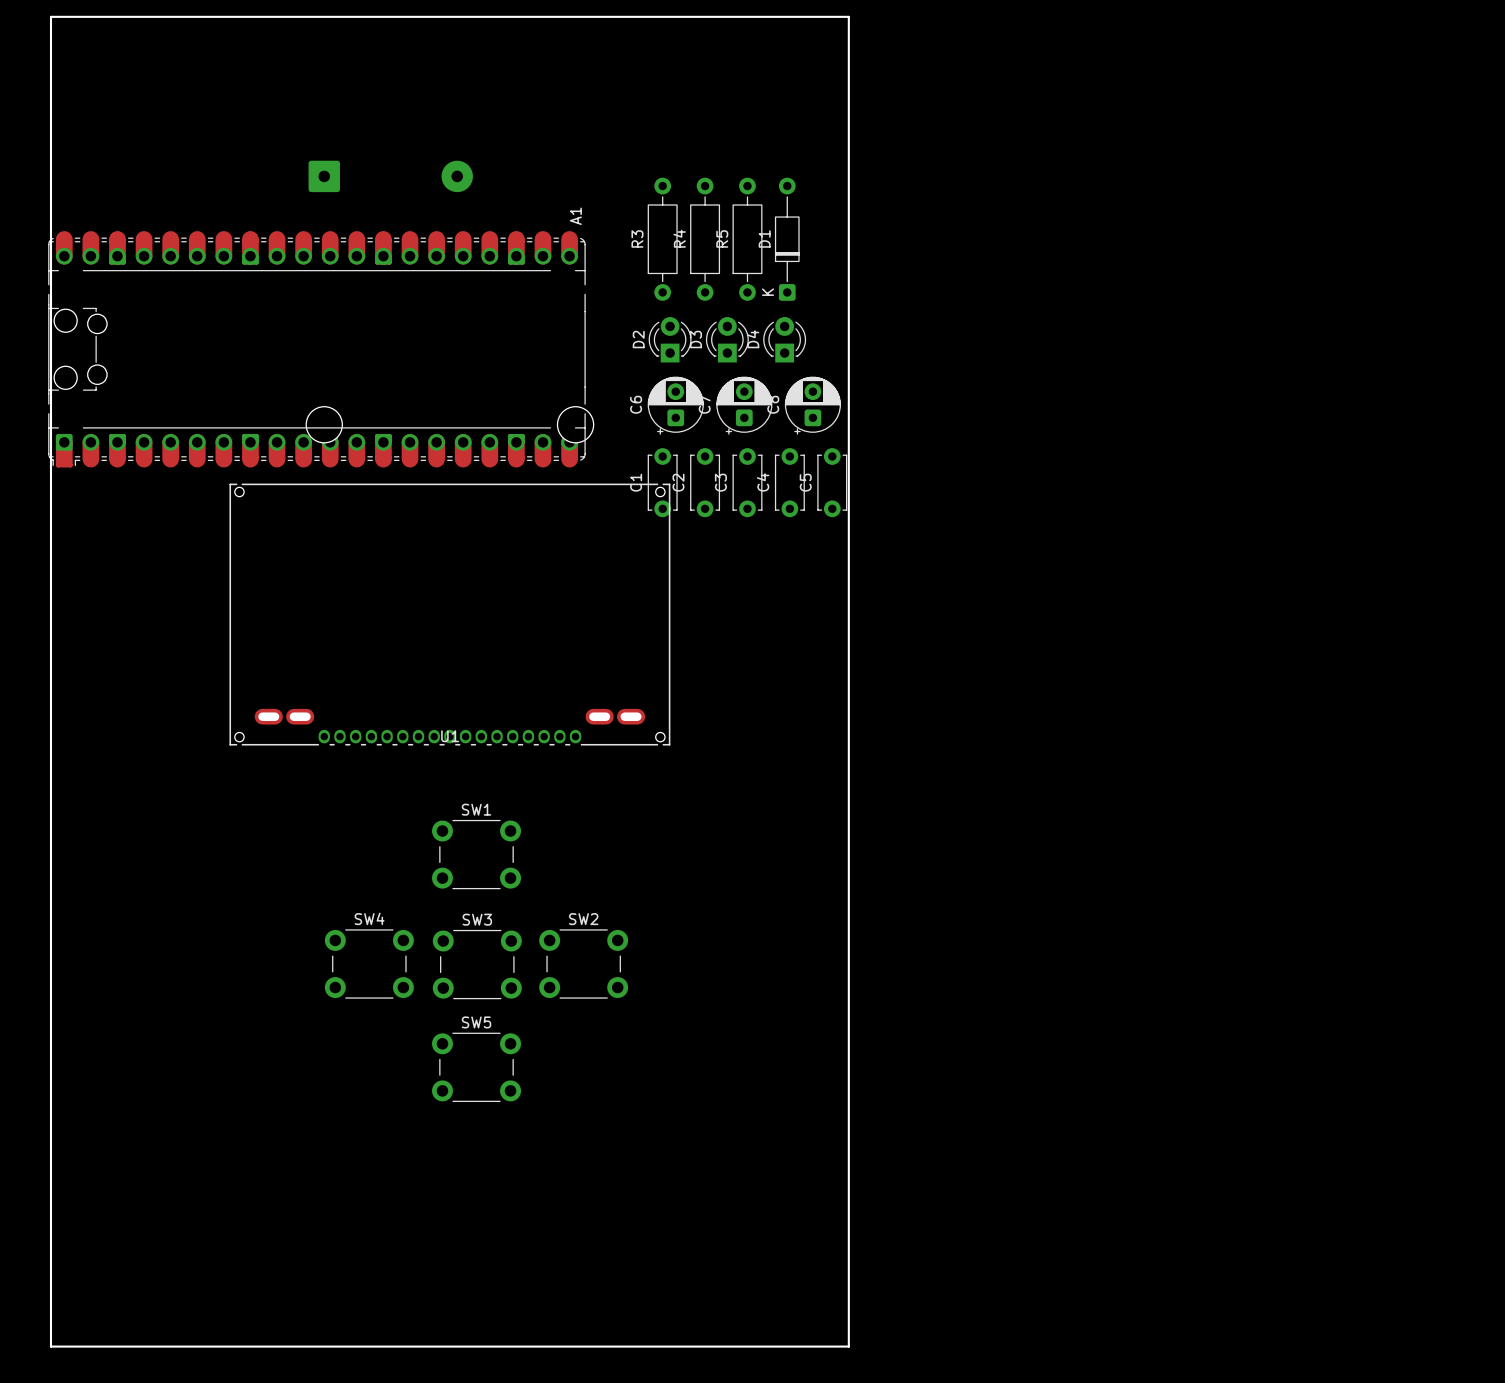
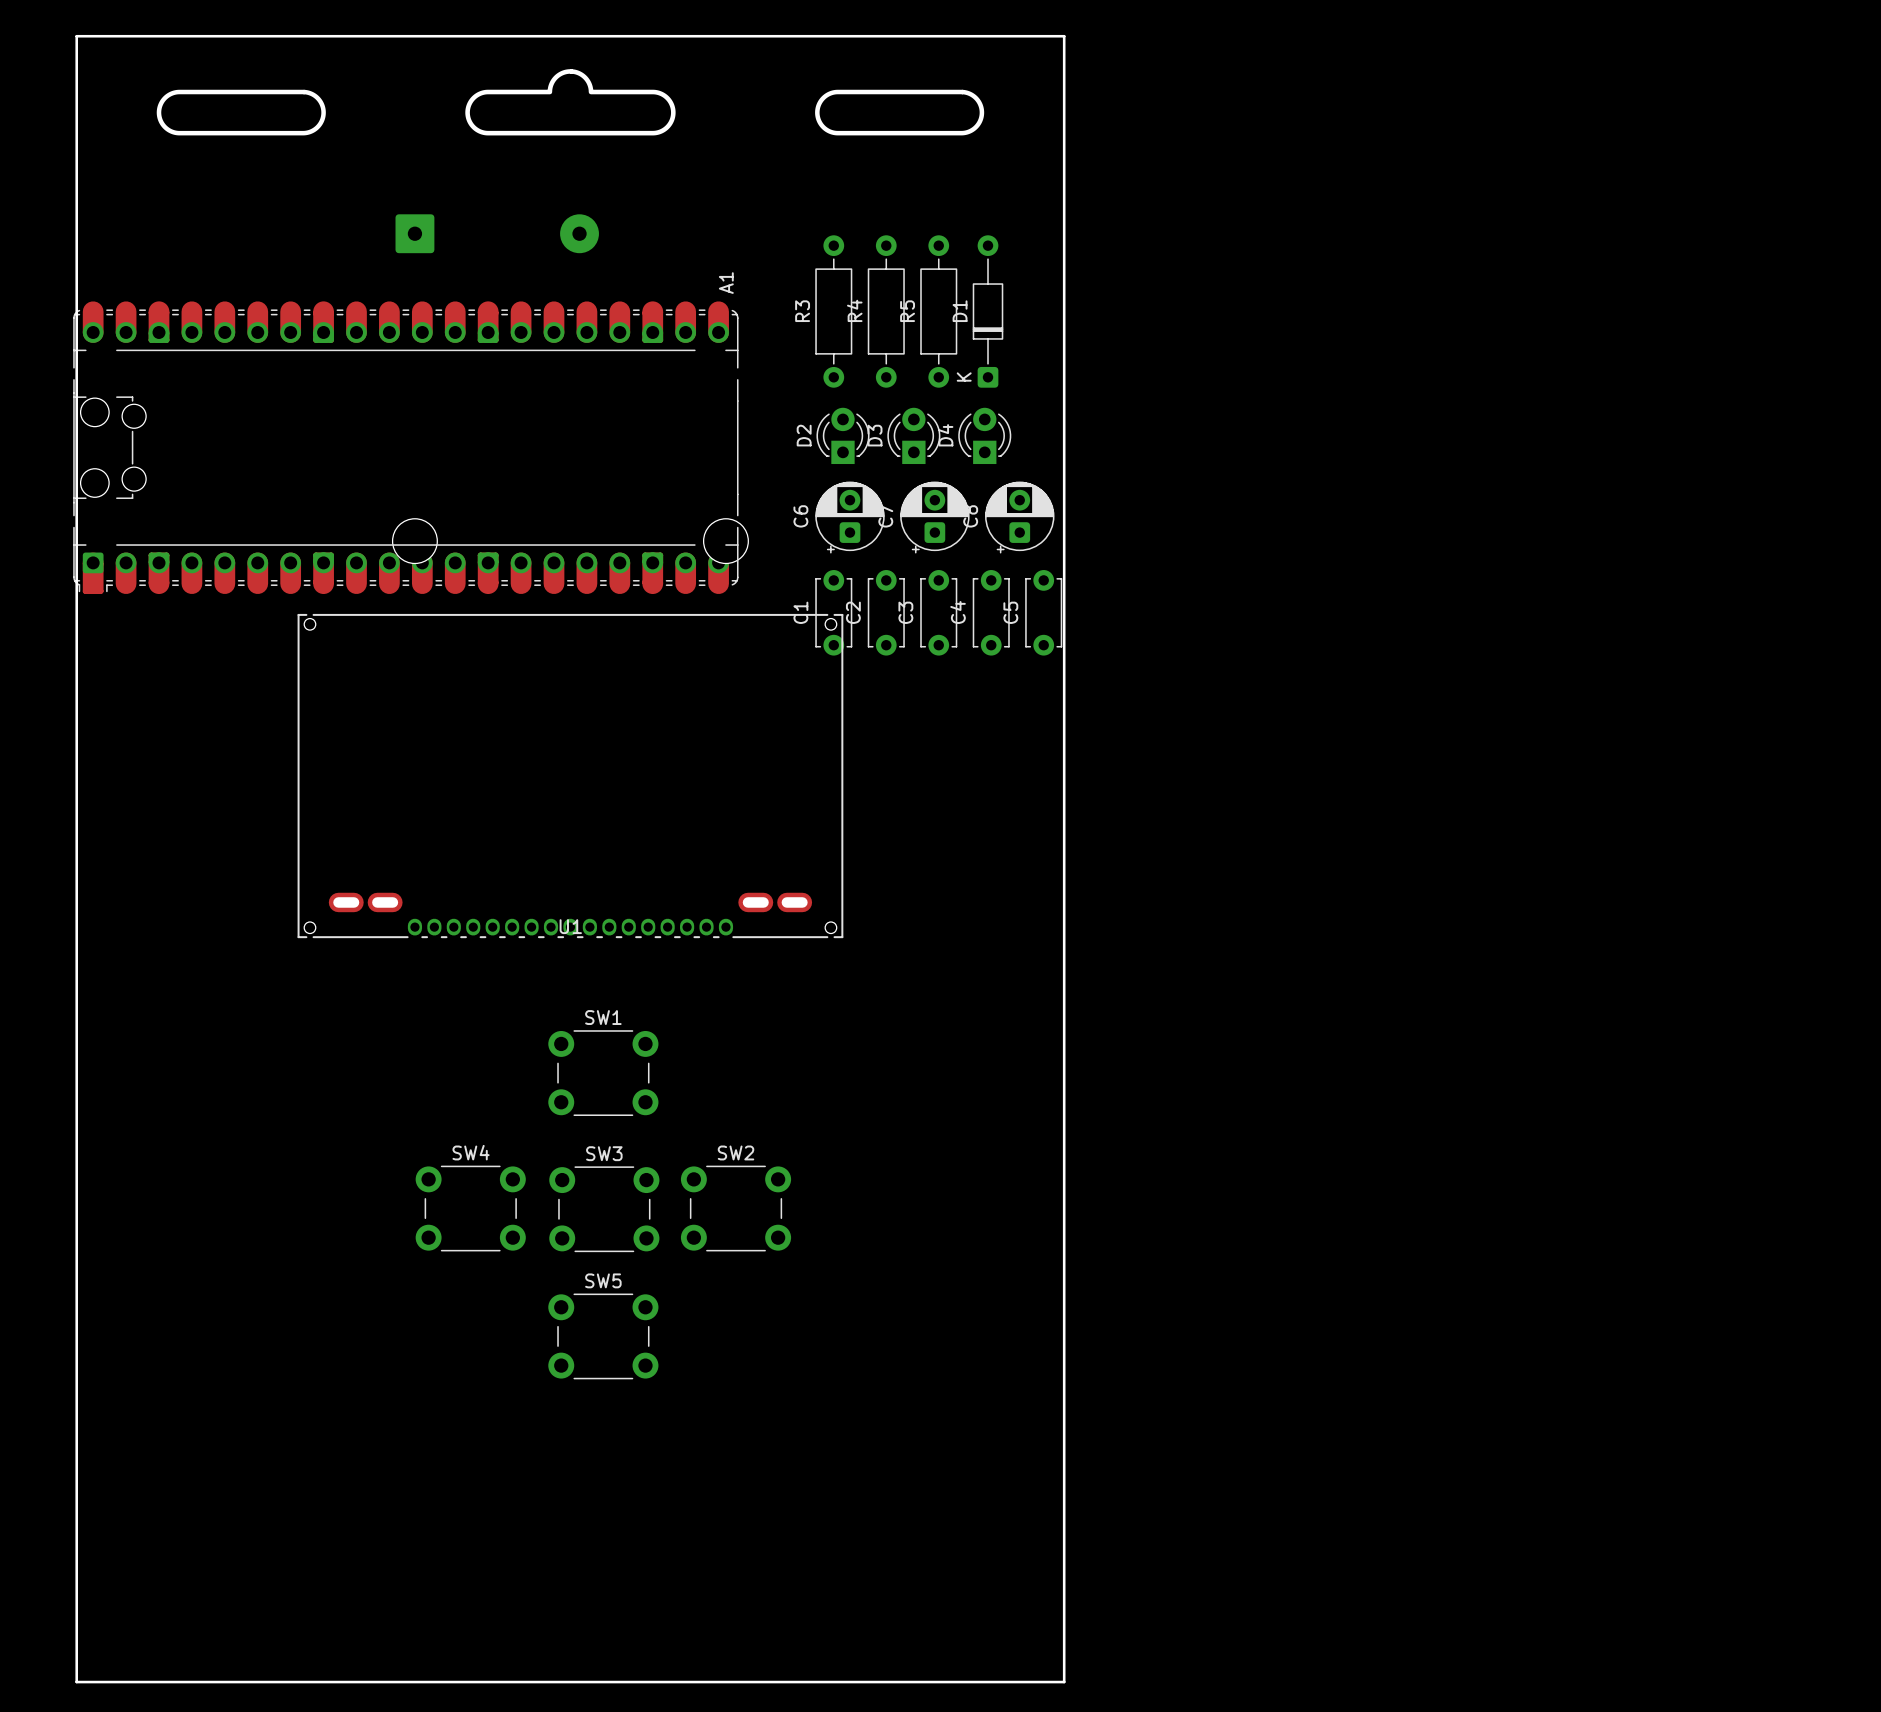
drawing: none -> [156, 69, 985, 136]

